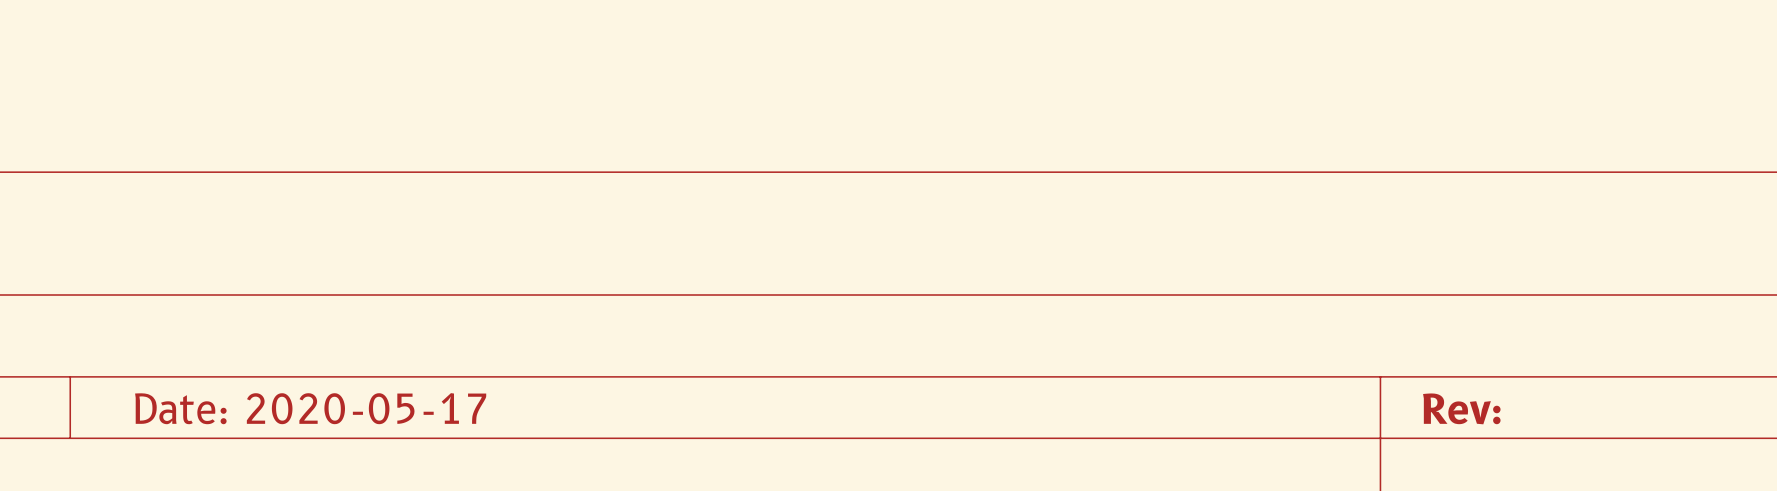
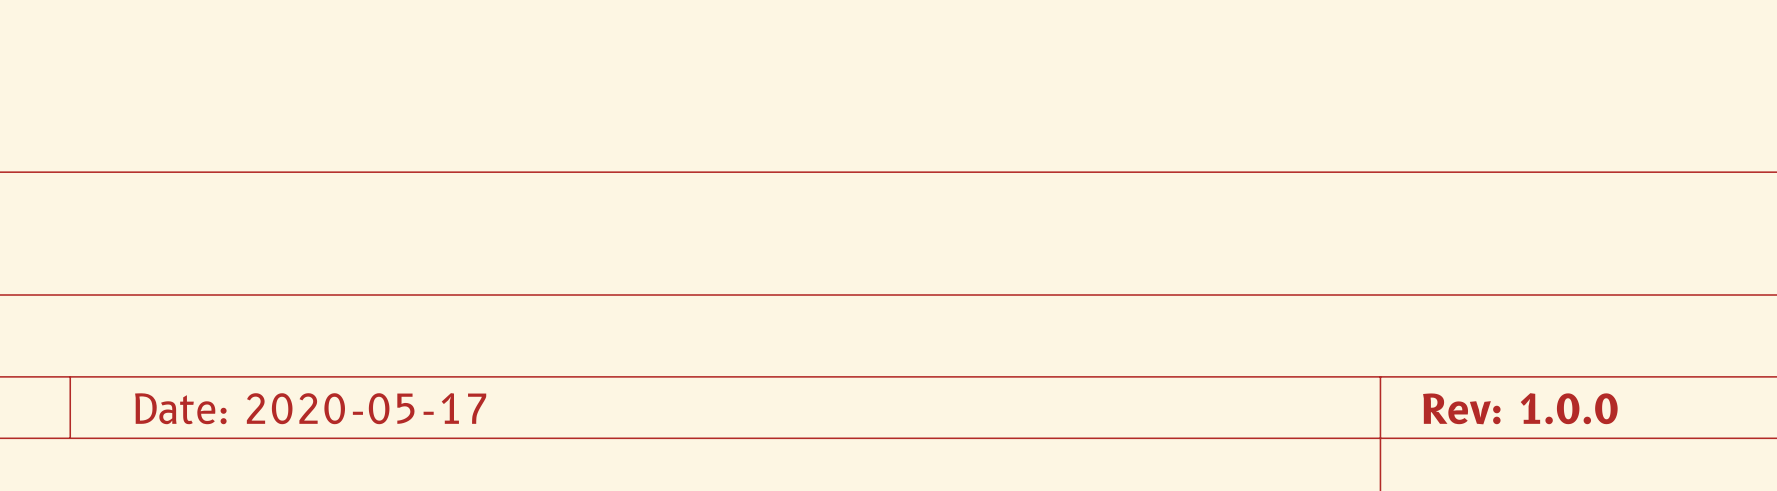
title block: Rev: (1461, 408) -> Rev: 1.0.0 (1520, 408)

